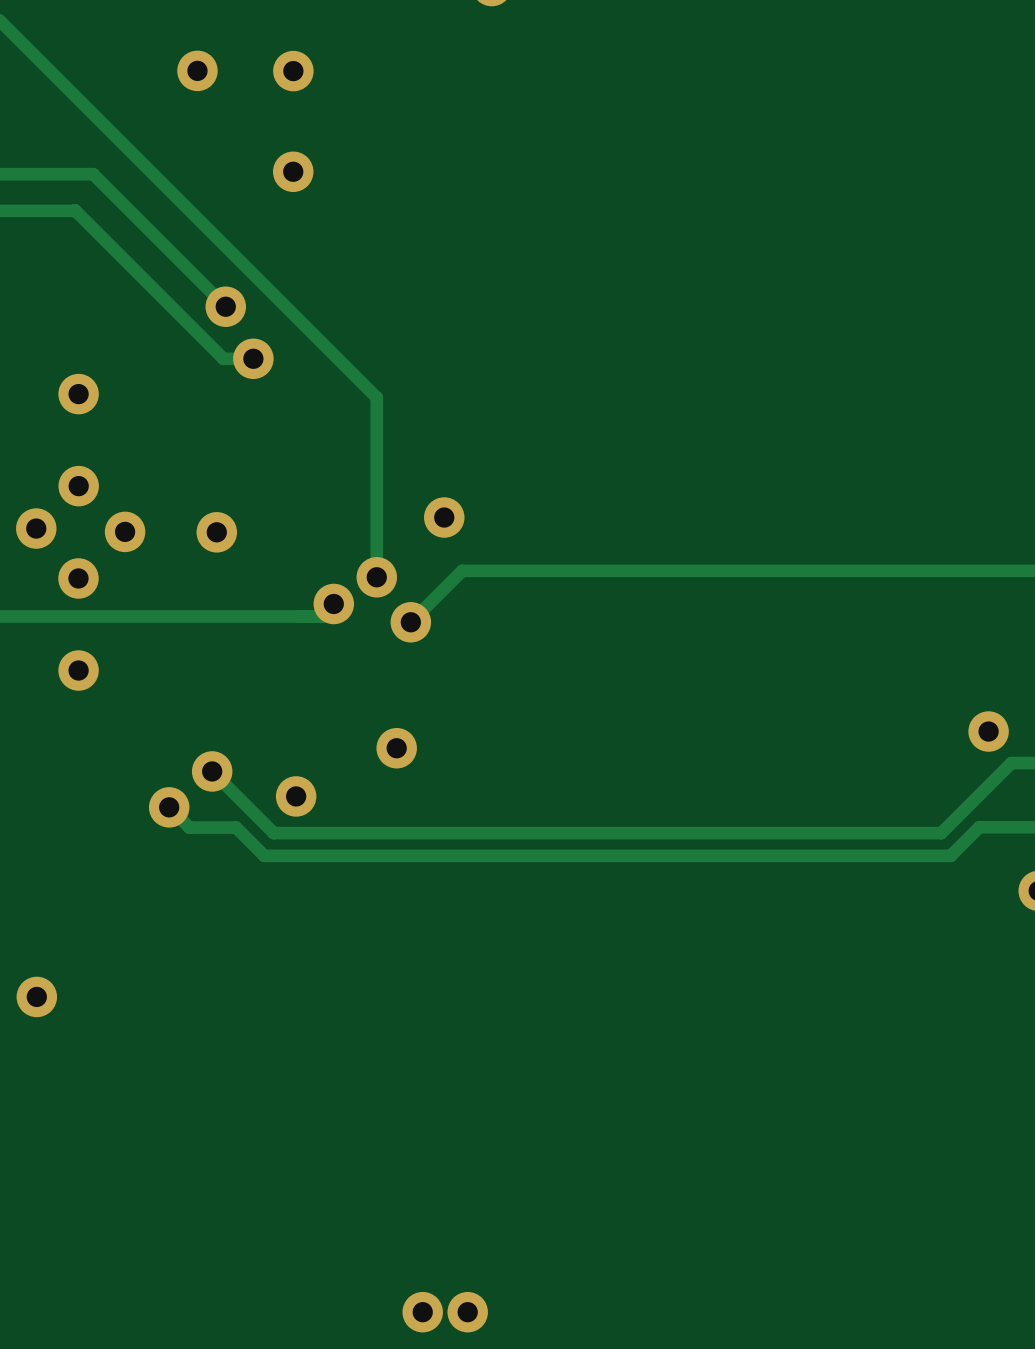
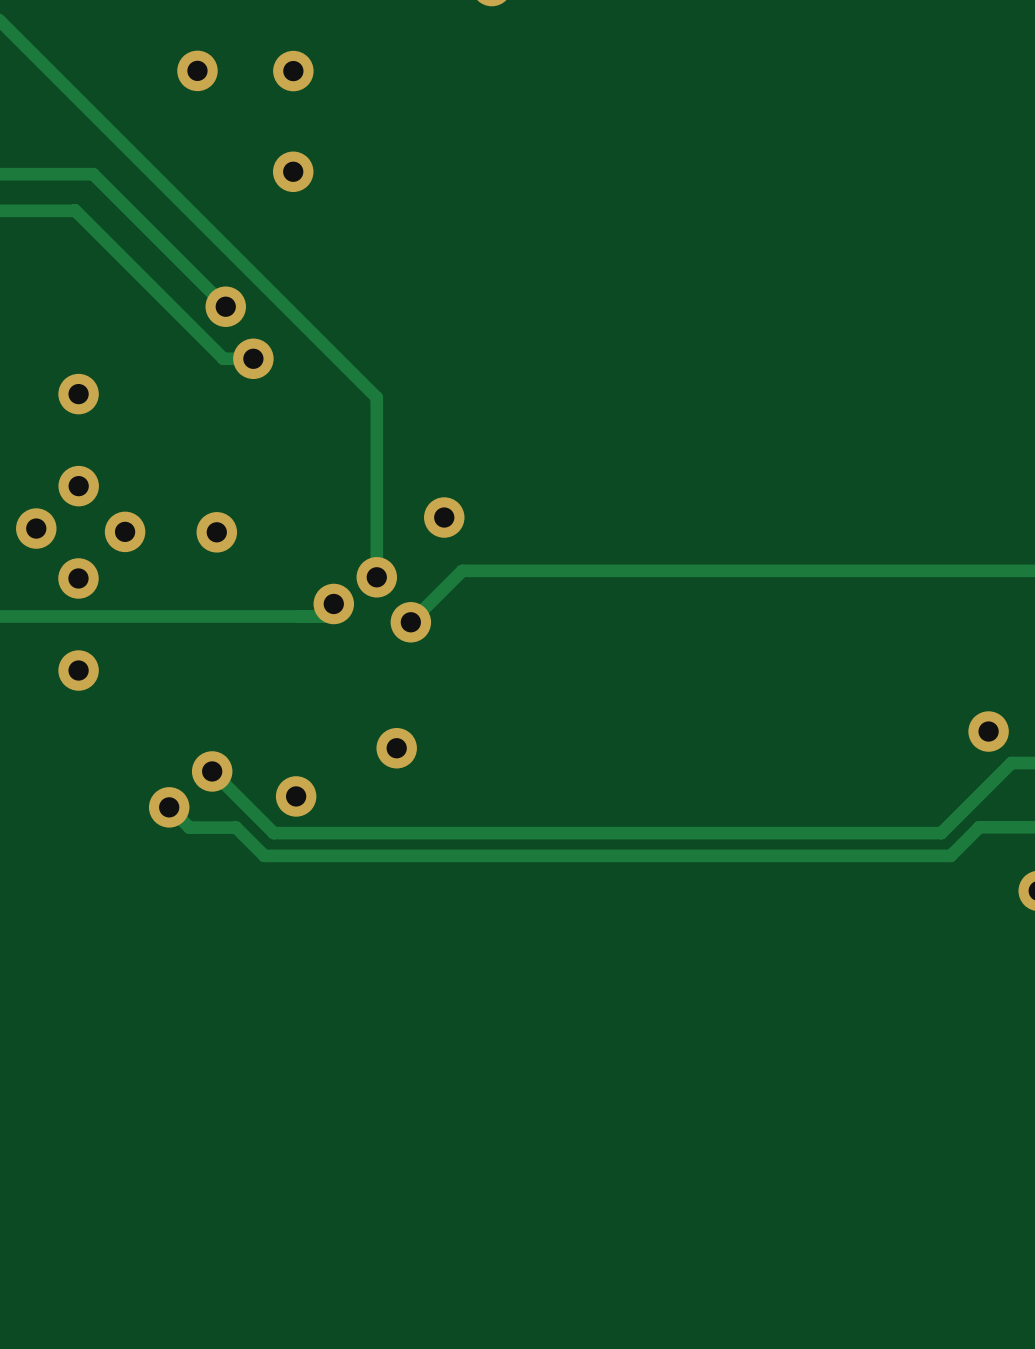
via: (36, 996) -> none
via: (422, 1312) -> none
via: (467, 1312) -> none

